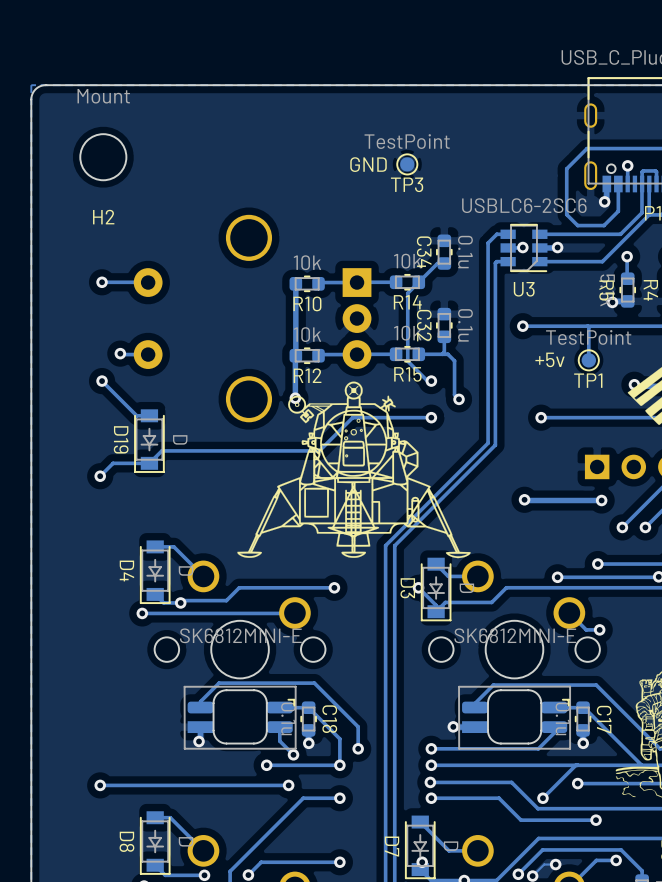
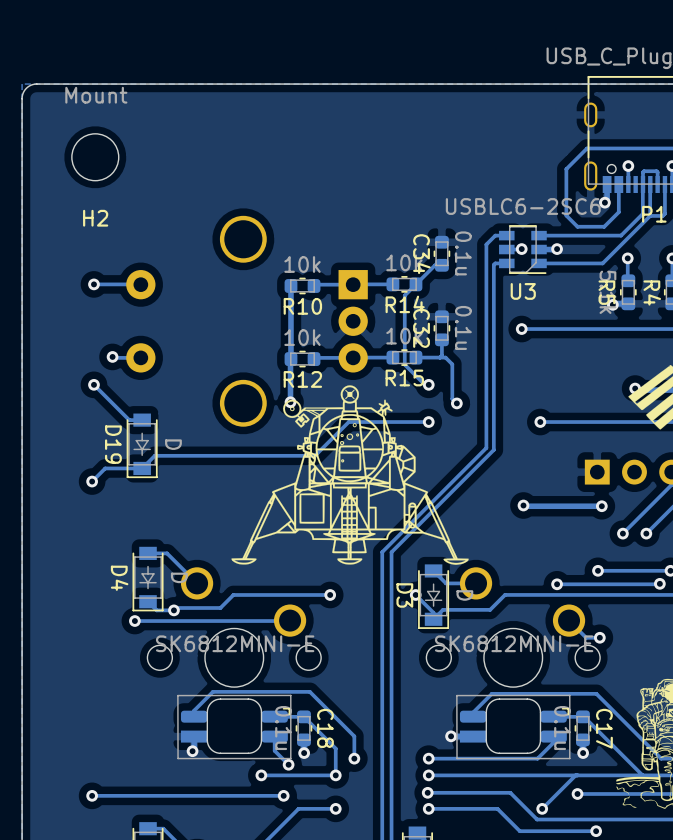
text: GND (368, 164) -> none
TP3: TestPoint (407, 164) -> none
track: (587, 326) (588, 360) -> none
text: +5v (550, 359) -> none
TP1: TestPoint (588, 360) -> none

